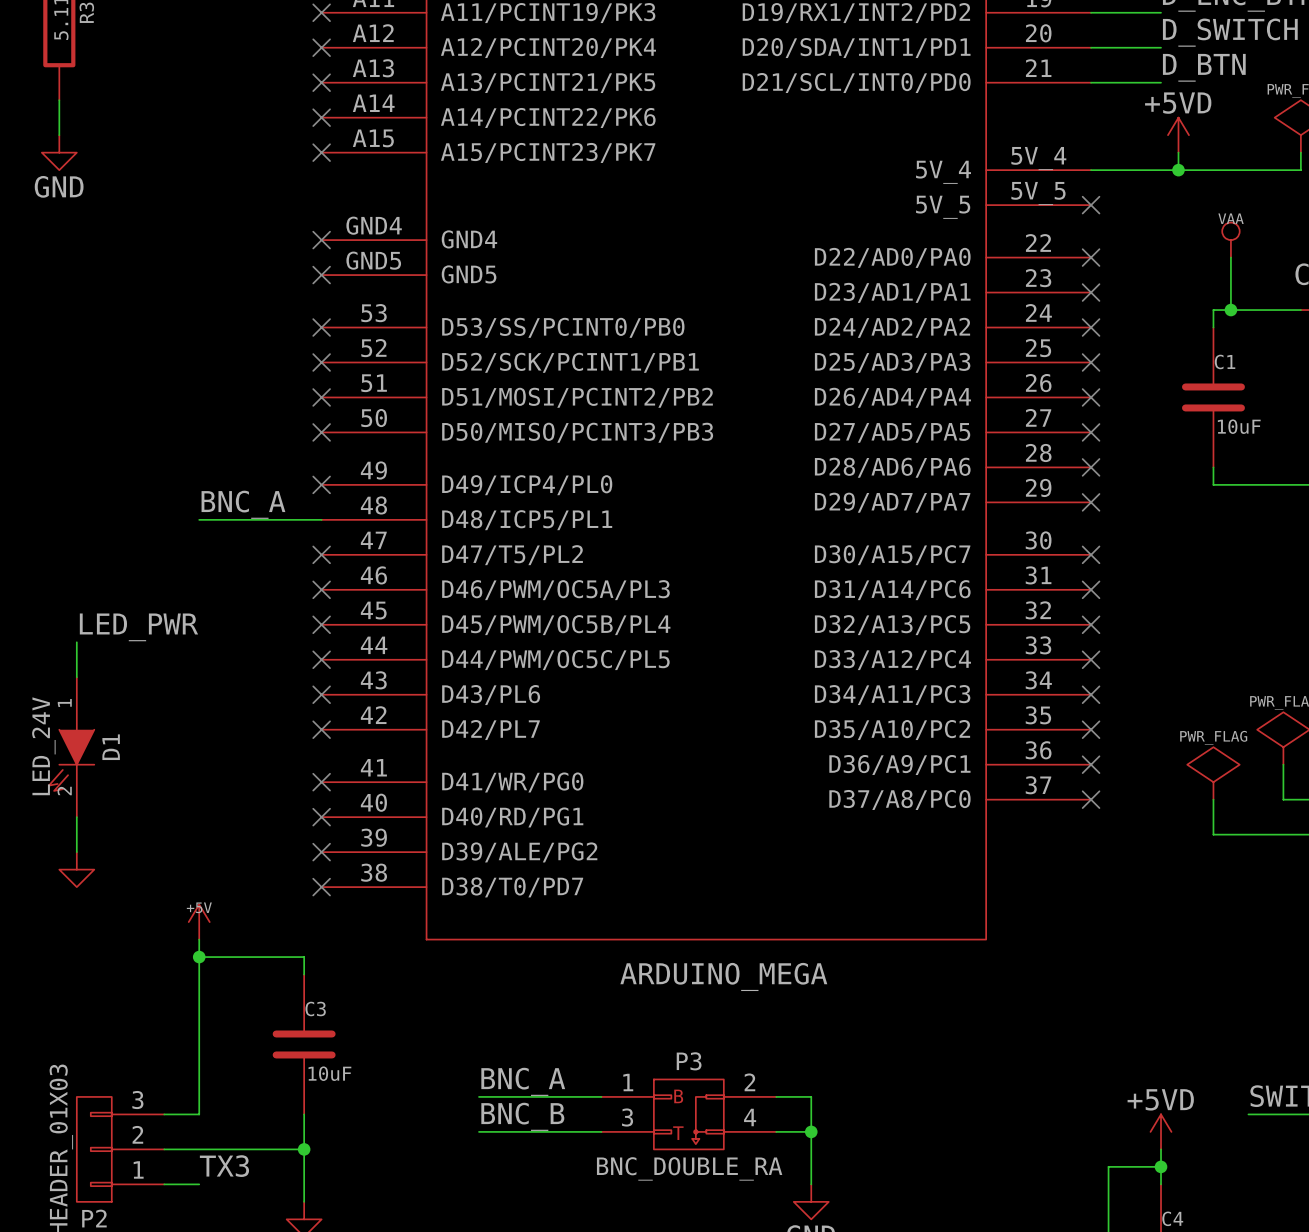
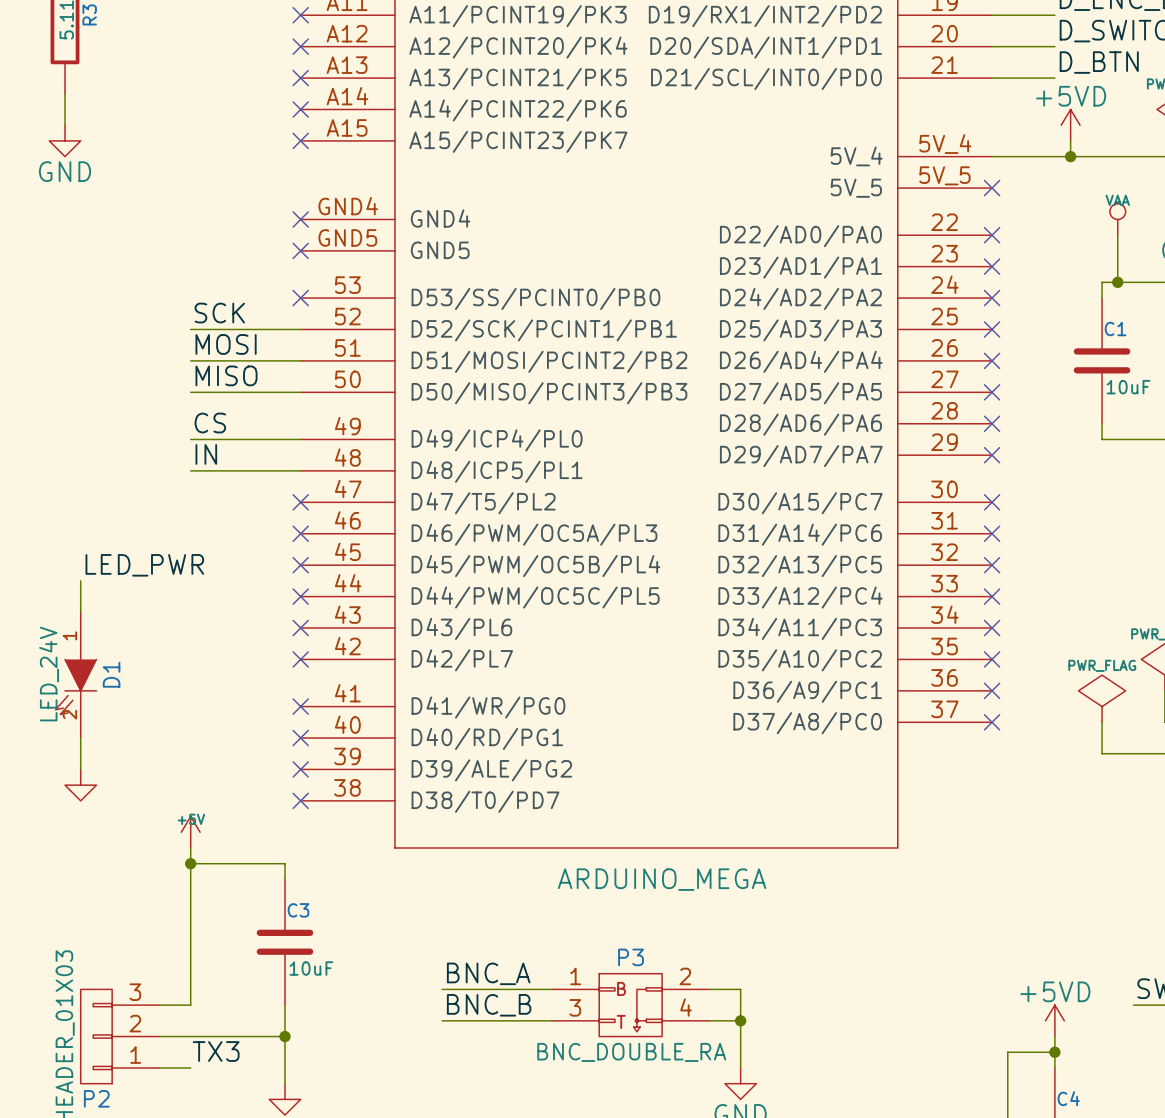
label: none -> SCK (219, 313)
wire: none -> (190, 329) (300, 329)
no-connect mark: (321, 362) -> none
label: none -> MOSI (226, 344)
wire: none -> (190, 360) (300, 360)
no-connect mark: (321, 397) -> none
label: none -> MISO (226, 375)
wire: none -> (190, 392) (300, 392)
no-connect mark: (321, 432) -> none
label: none -> CS (210, 423)
wire: none -> (190, 439) (300, 439)
no-connect mark: (321, 484) -> none
label: BNC_A (243, 504) -> IN (206, 454)

